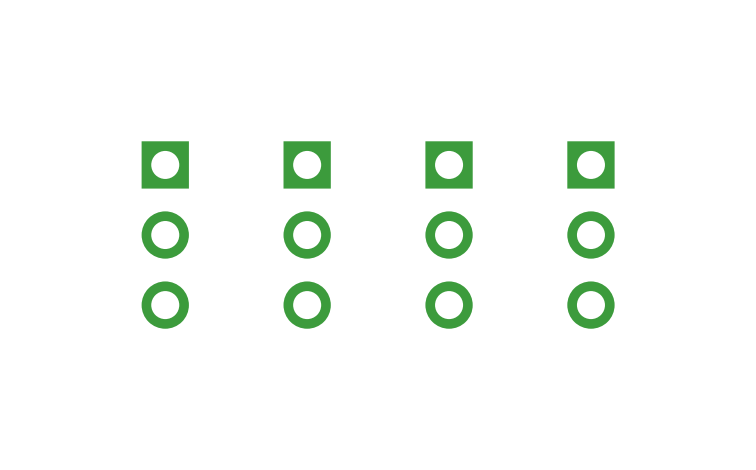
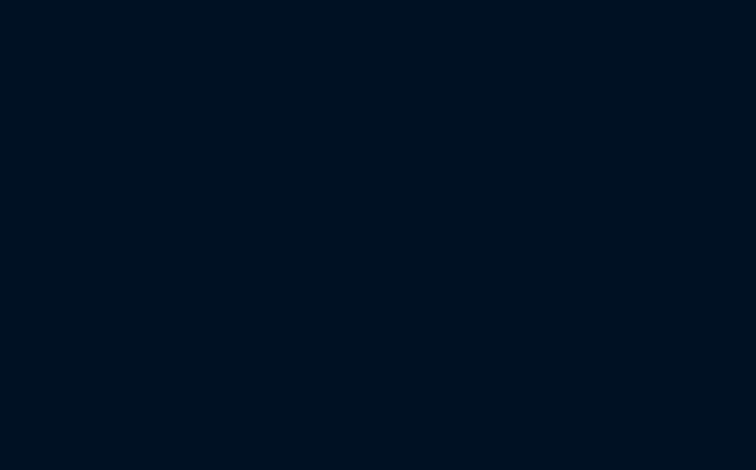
part: (165, 235) -> none
part: (307, 235) -> none
part: (449, 235) -> none
part: (590, 235) -> none

